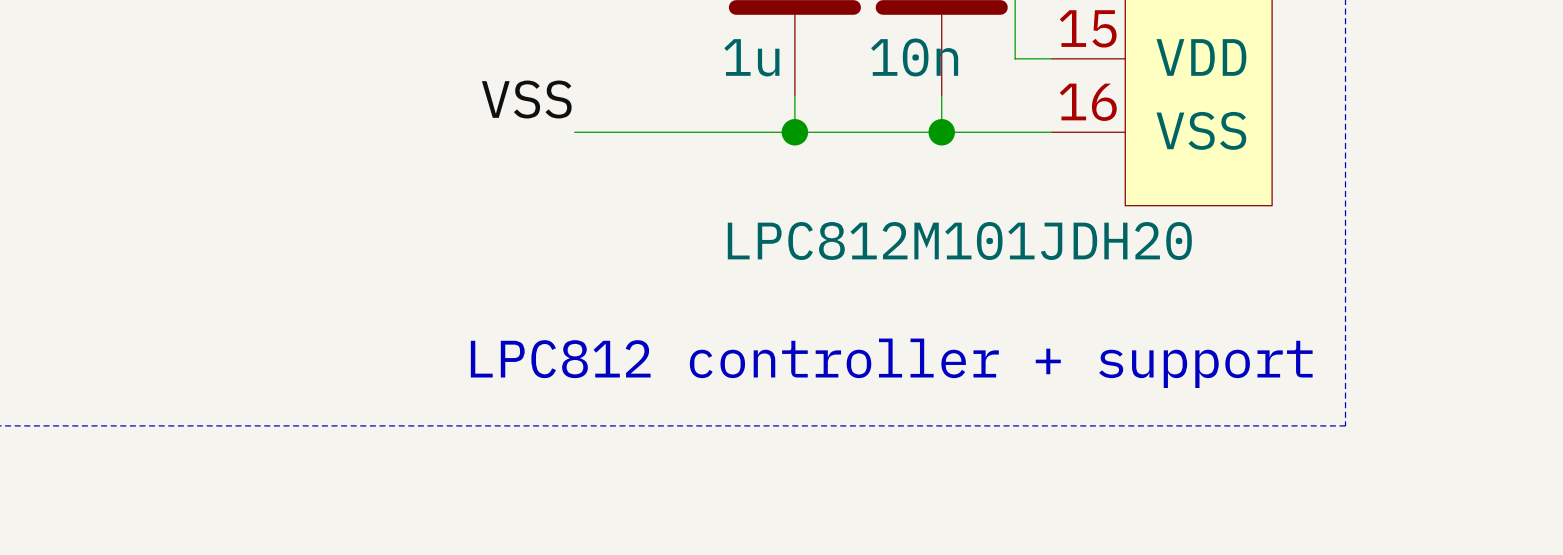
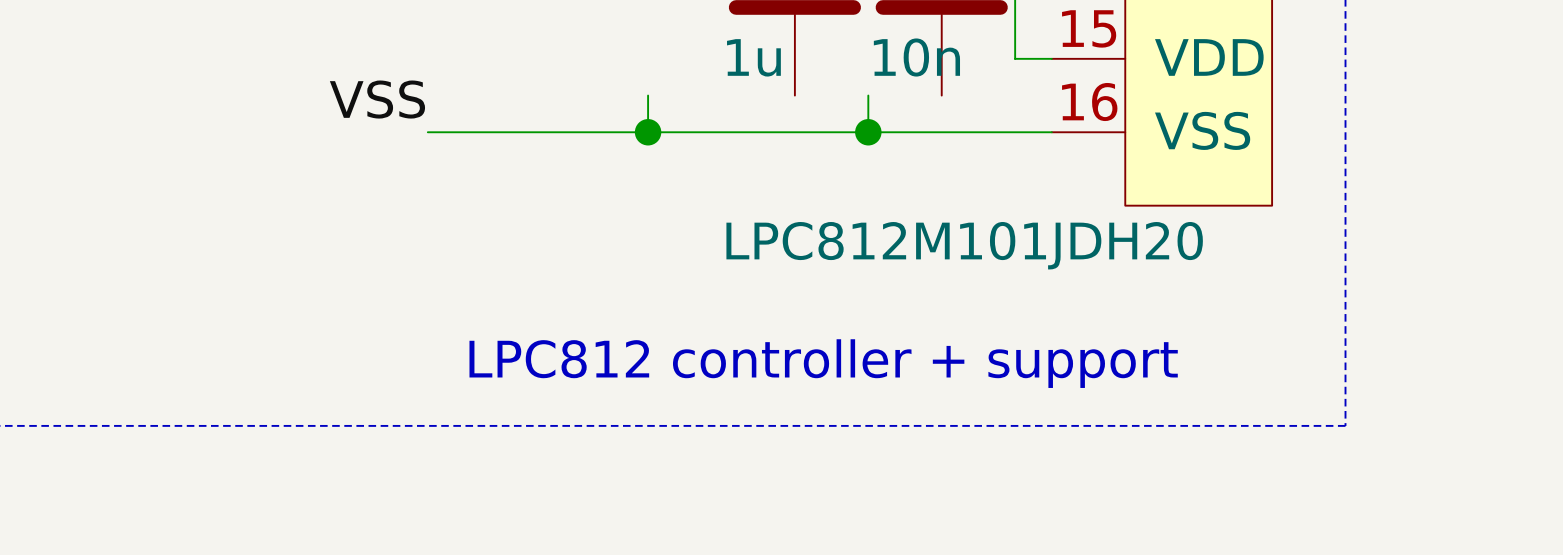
wire: (794, 95) (794, 132) -> (648, 95) (648, 132)
wire: (941, 95) (941, 132) -> (868, 95) (868, 132)
label position: VSS (526, 99) -> VSS (377, 99)
wire: none -> (427, 132) (574, 132)
junction: none -> (648, 132)
junction: (794, 132) -> none
junction: none -> (868, 132)
junction: (941, 132) -> none

